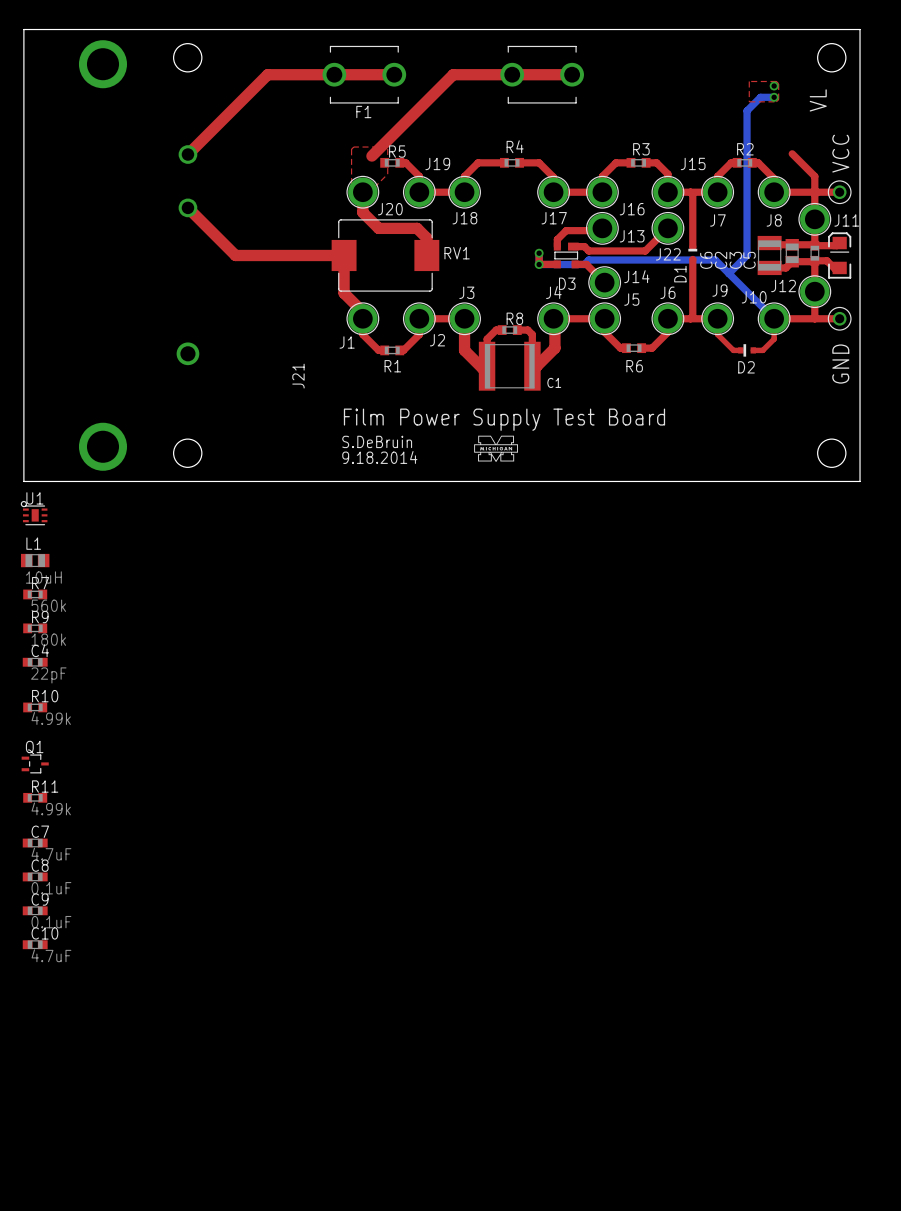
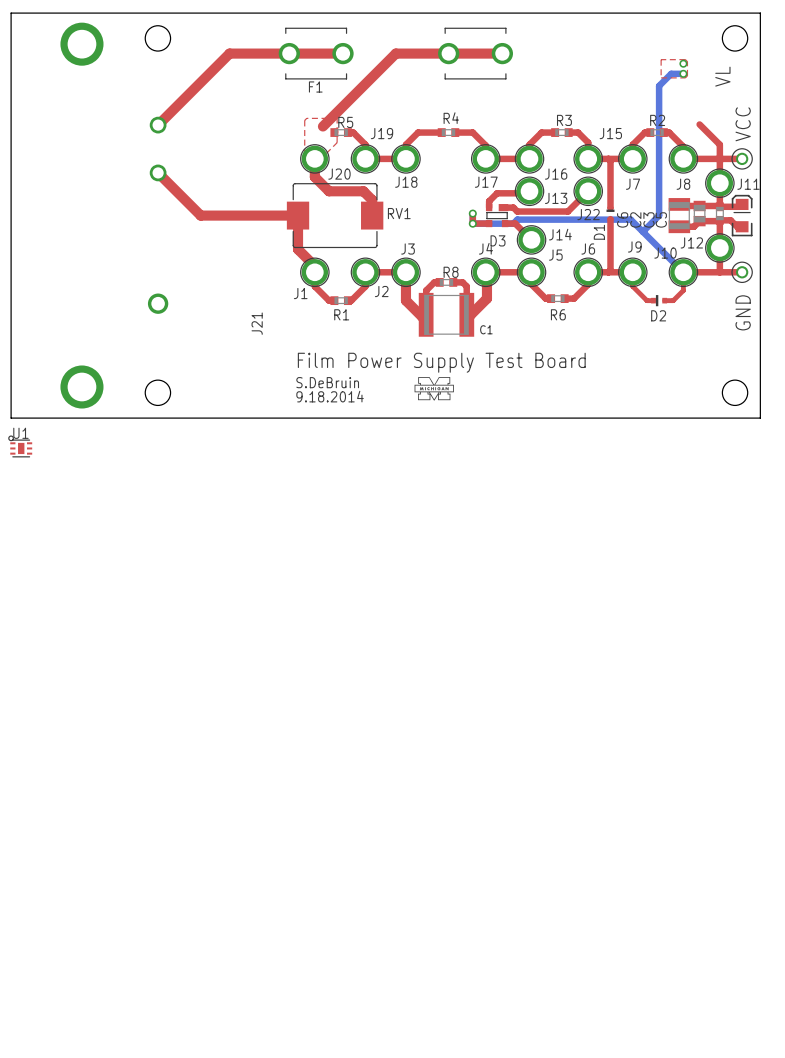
L1: 10uH (35, 560) -> none
R7: 560k (35, 594) -> none
R9: 180k (35, 628) -> none
C4: 22pF (35, 662) -> none
R10: 4.99k (35, 707) -> none
Q1: (35, 763) -> none
R11: 4.99k (35, 797) -> none
C7: 4.7uF (35, 843) -> none
C8: 0.1uF (35, 876) -> none
C9: 0.1uF (35, 910) -> none
C10: 4.7uF (35, 944) -> none

